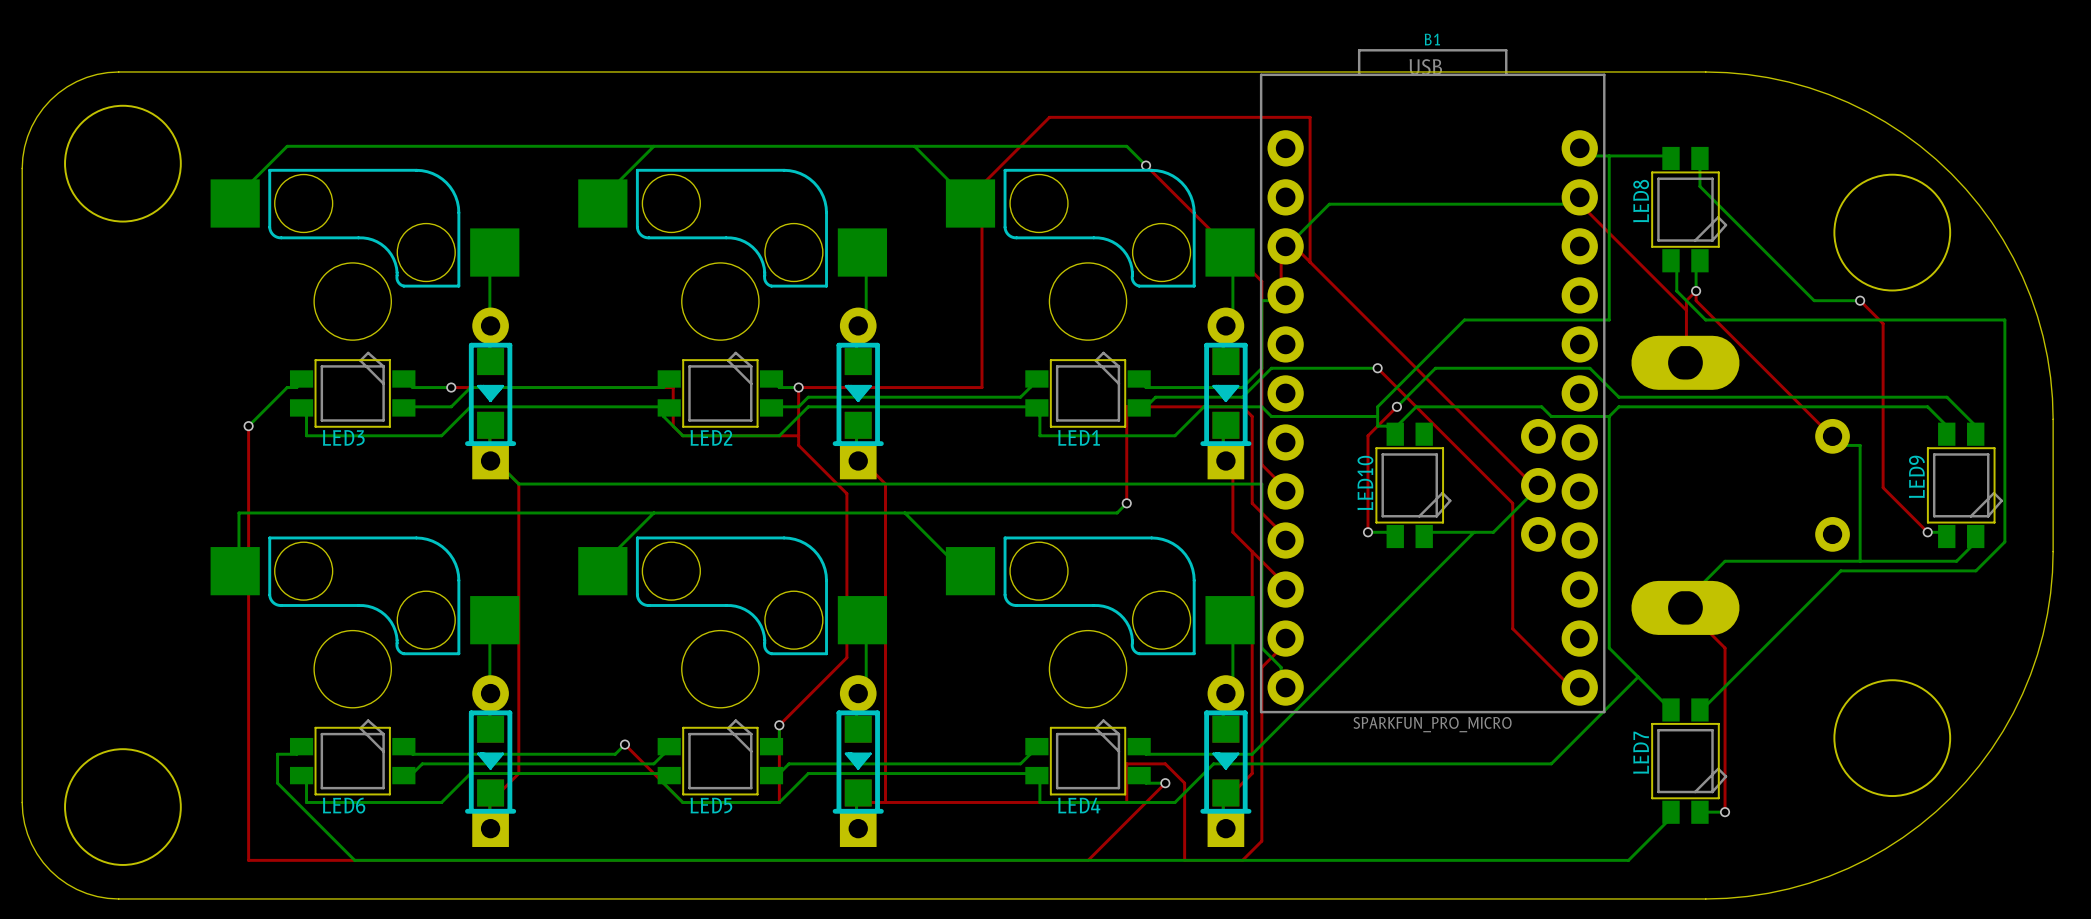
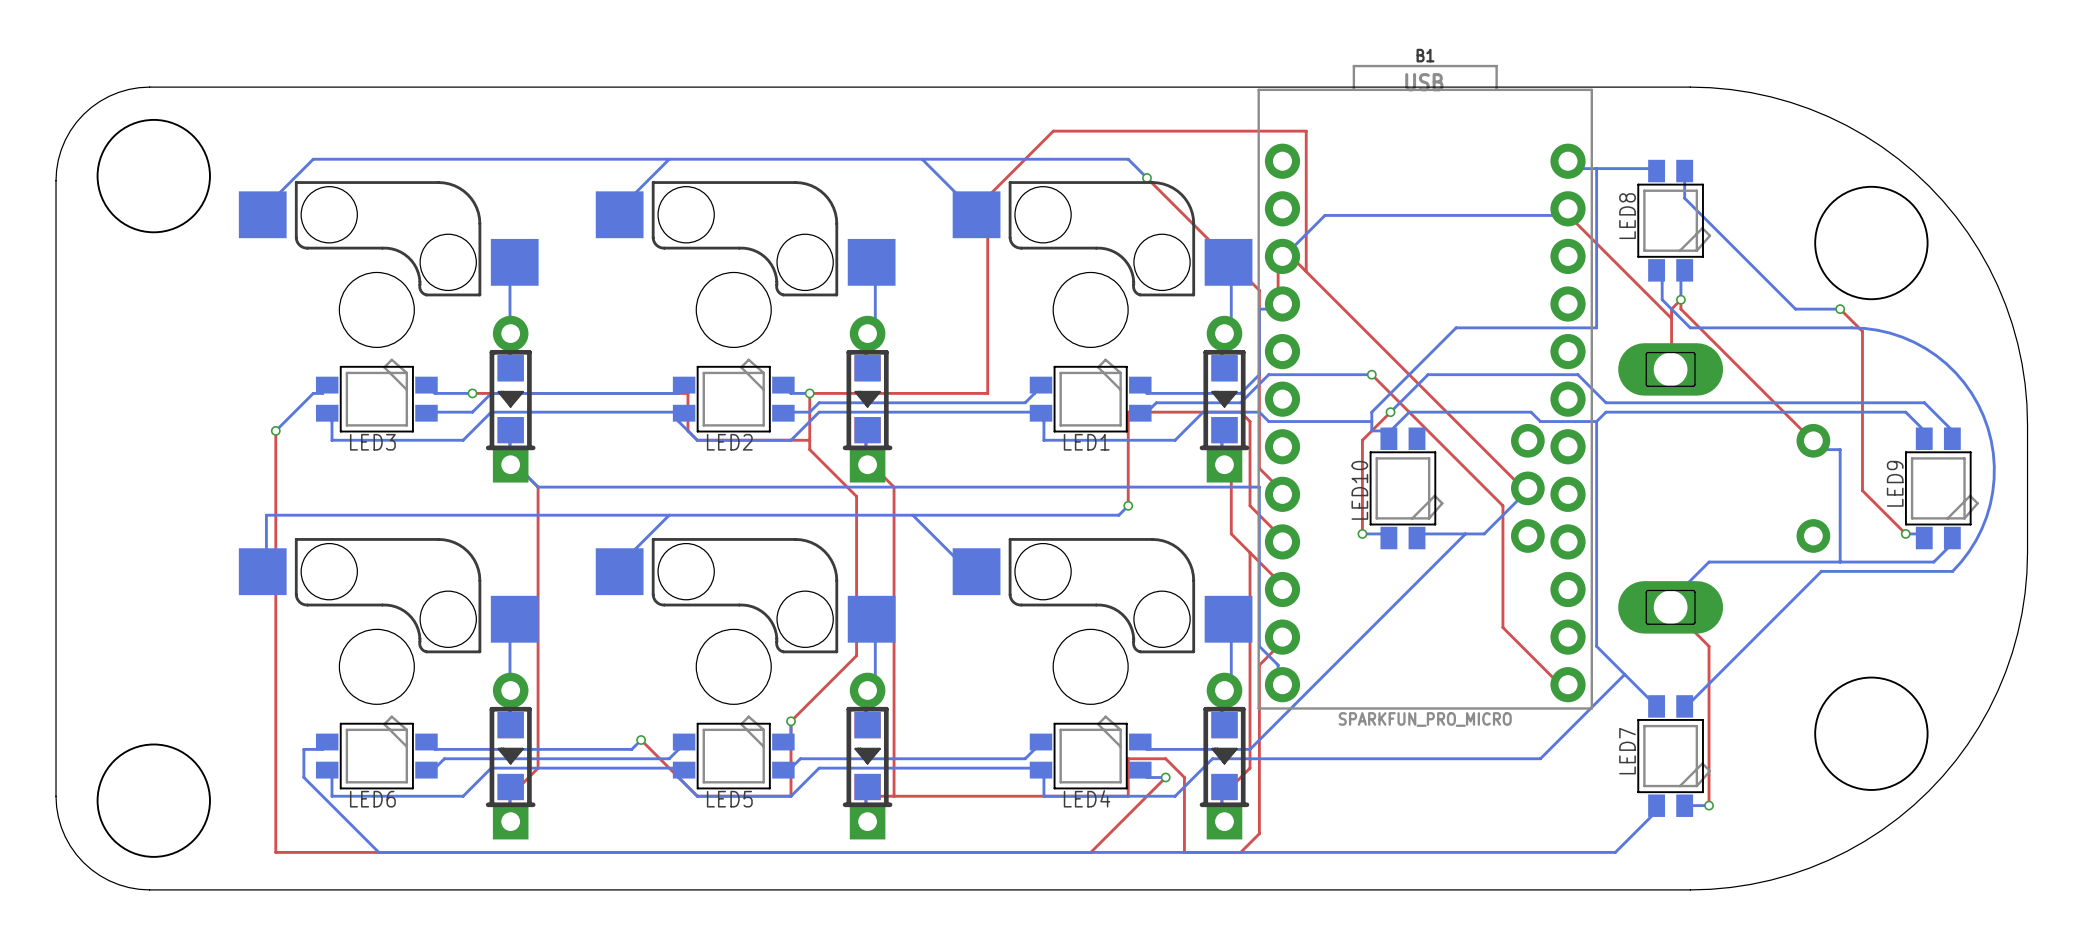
bottom track: (1872, 319) (2004, 319) (2004, 541) (1975, 570) -> (1851, 327) (1890, 333) (1925, 348) (1946, 363) (1964, 382) (1983, 415) (1993, 453) (1992, 491) (1986, 517) (1975, 540) (1952, 571)

